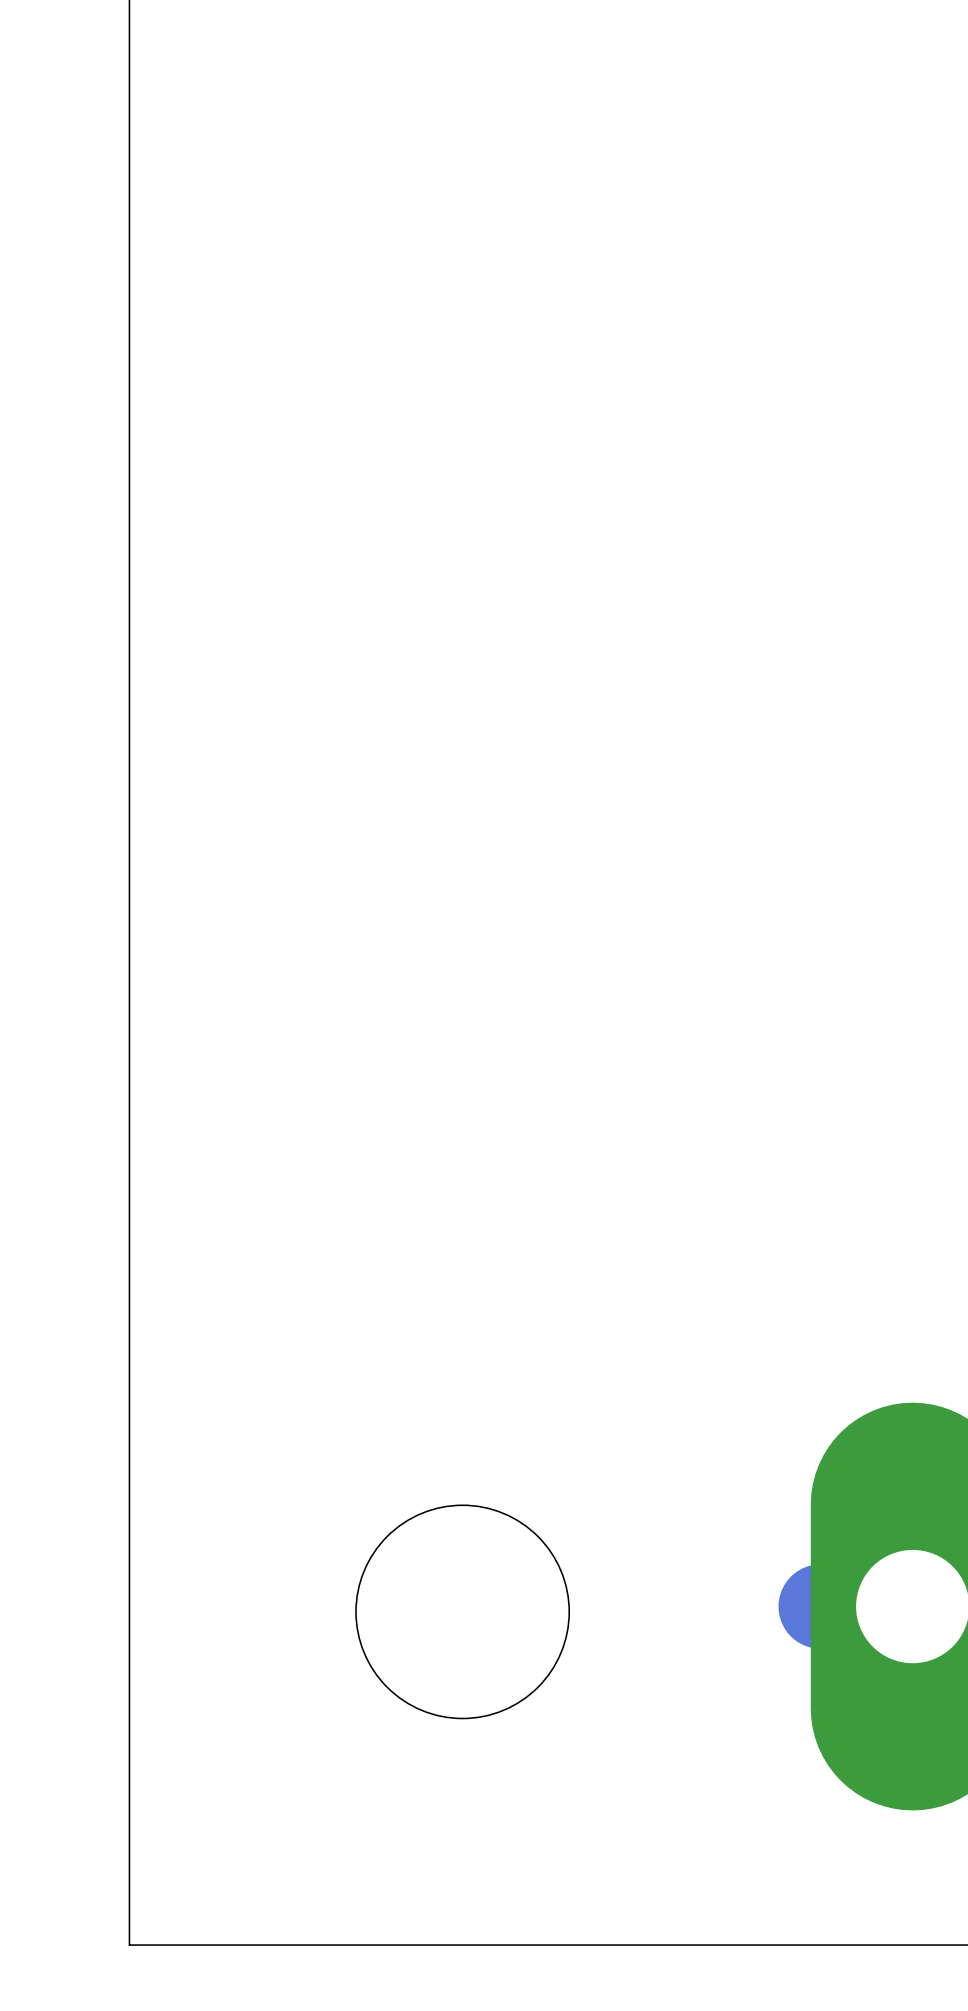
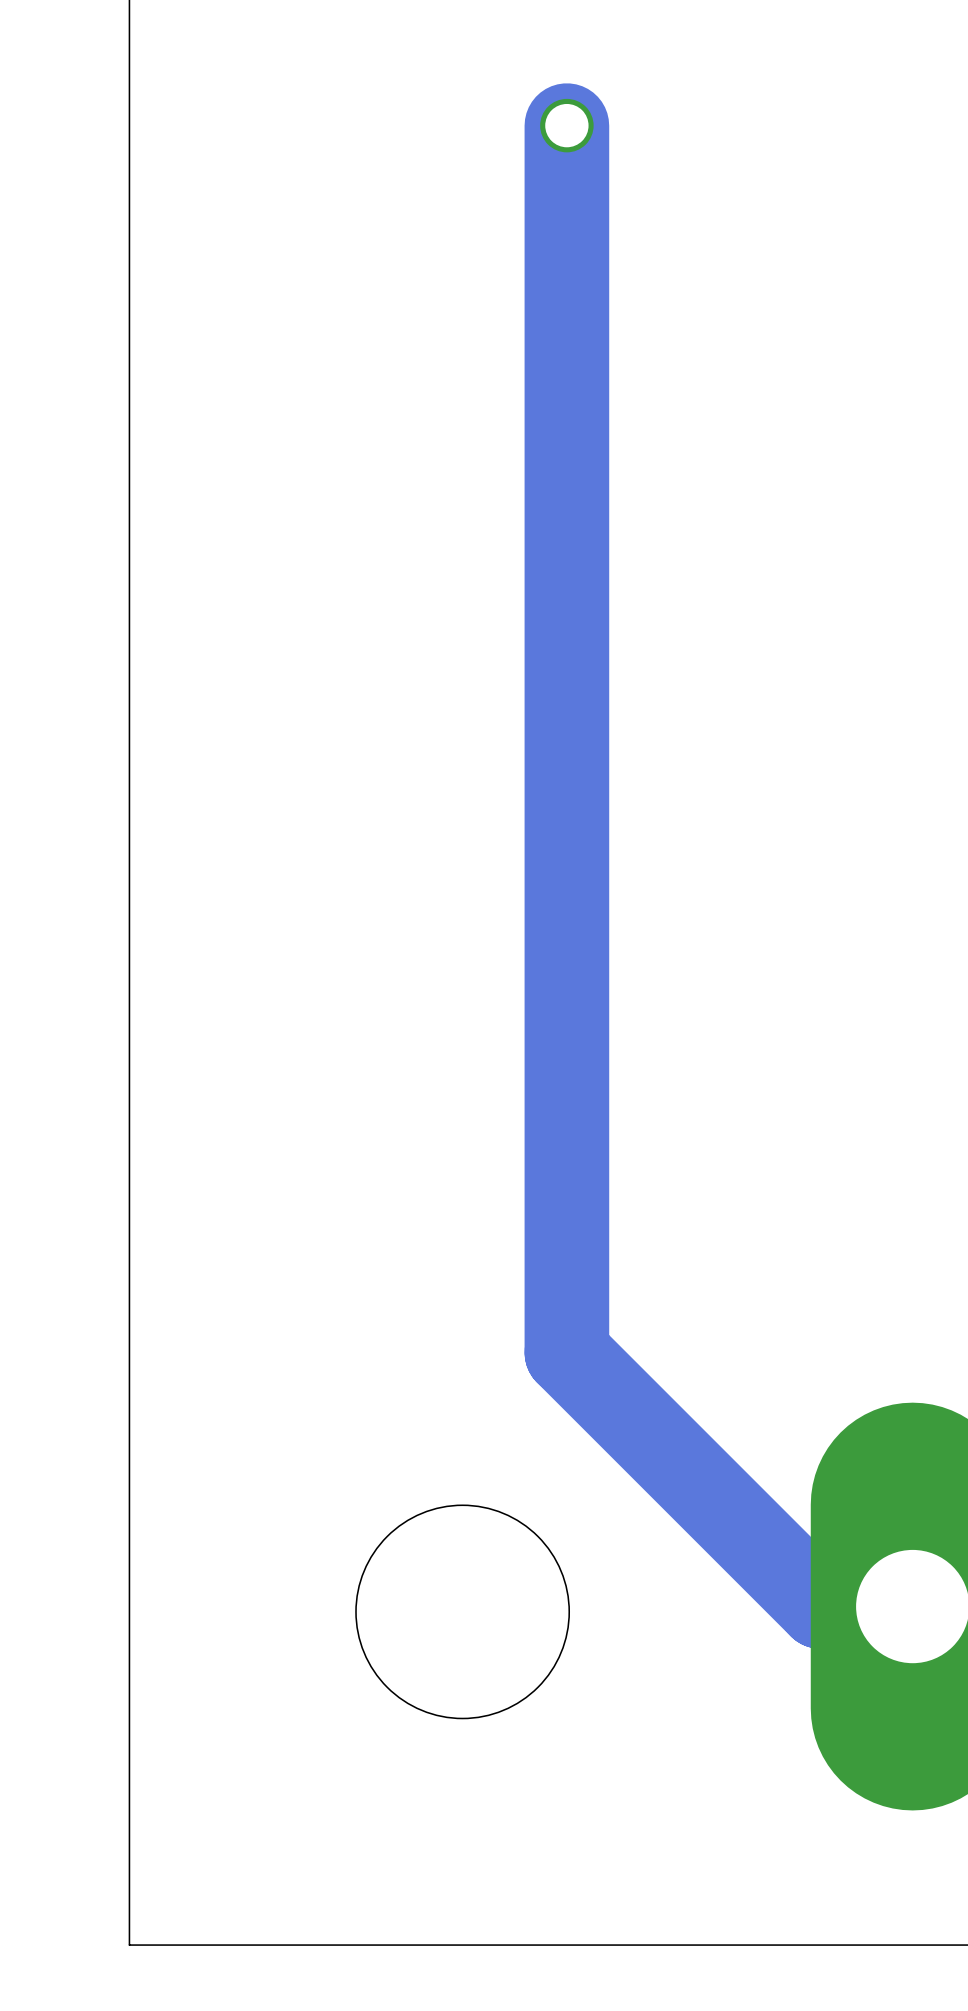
track: none -> (566, 125) (566, 1352) (820, 1606)
via: none -> (566, 125)

